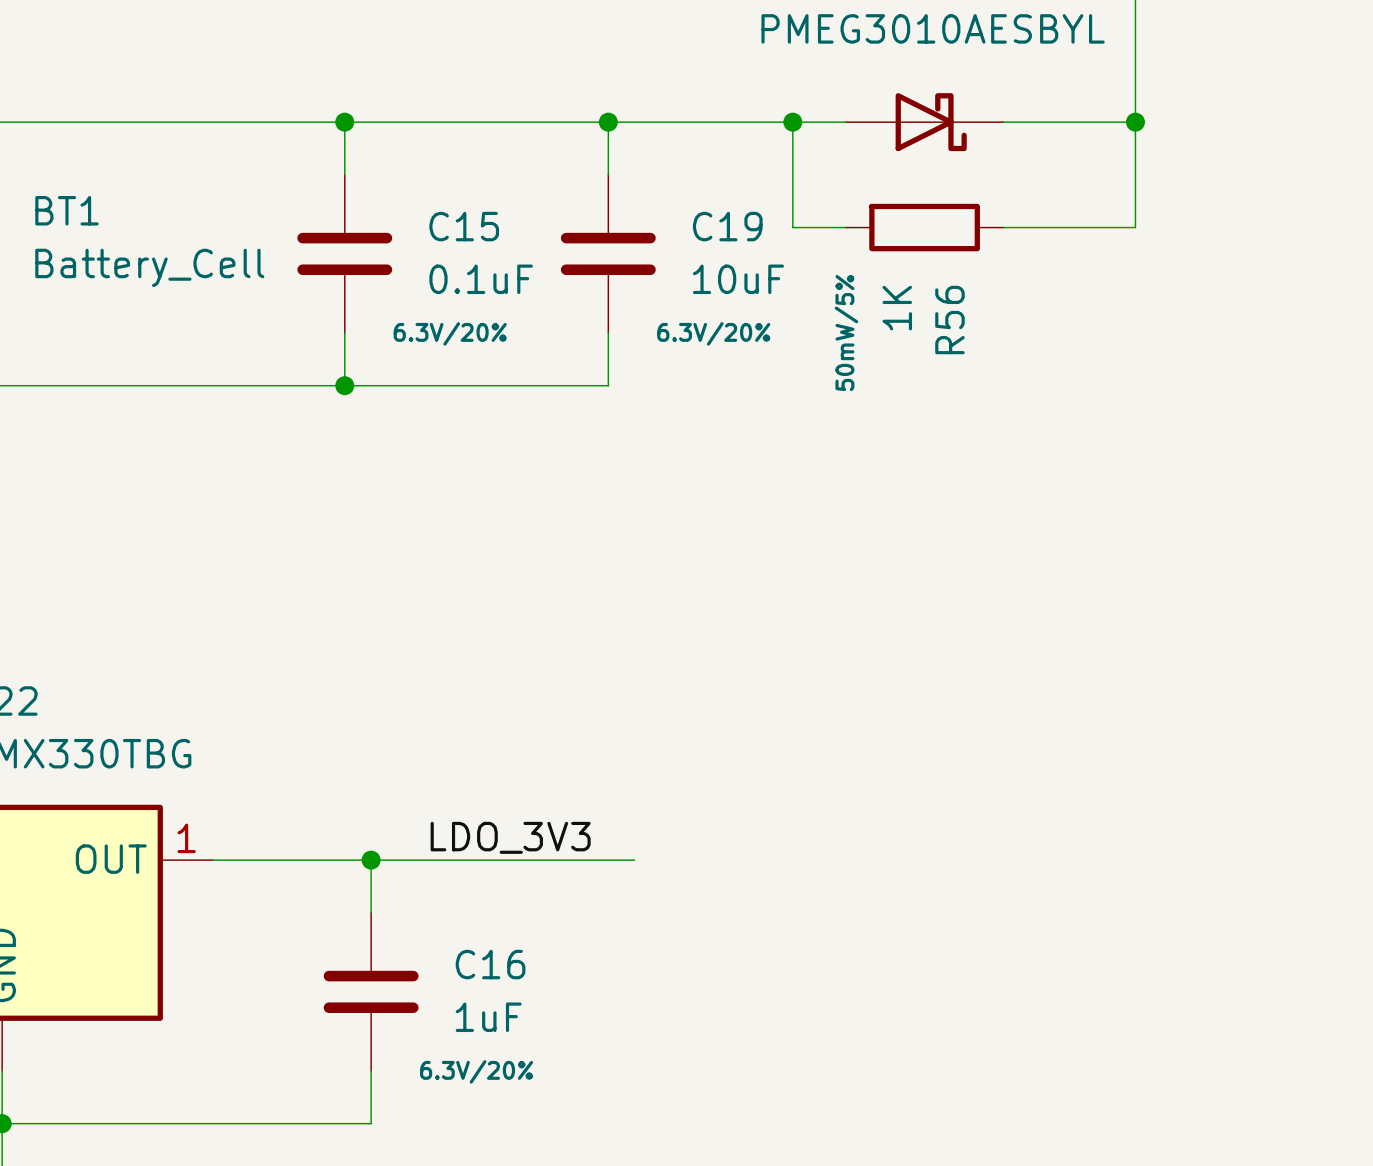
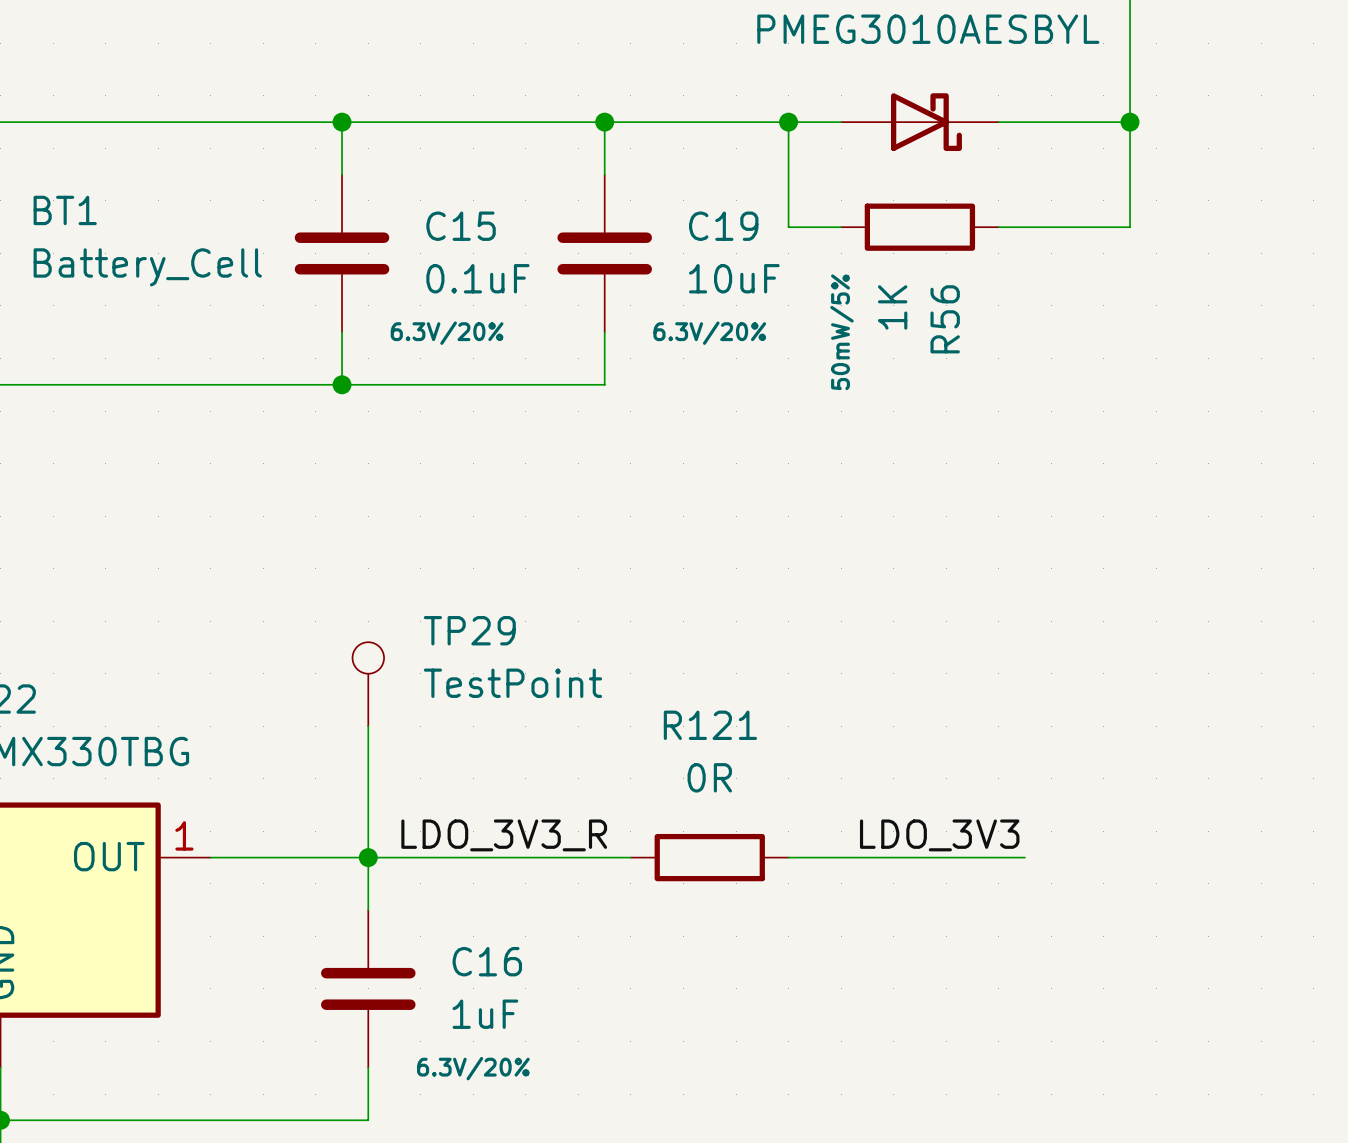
TP29: none -> TestPoint (368, 684)
wire: none -> (368, 726) (368, 857)
label: LDO_3V3 (510, 837) -> LDO_3V3_R (504, 835)
label: none -> LDO_3V3 (939, 835)
R121: none -> 0R (709, 857)
wire: none -> (788, 857) (1024, 857)

